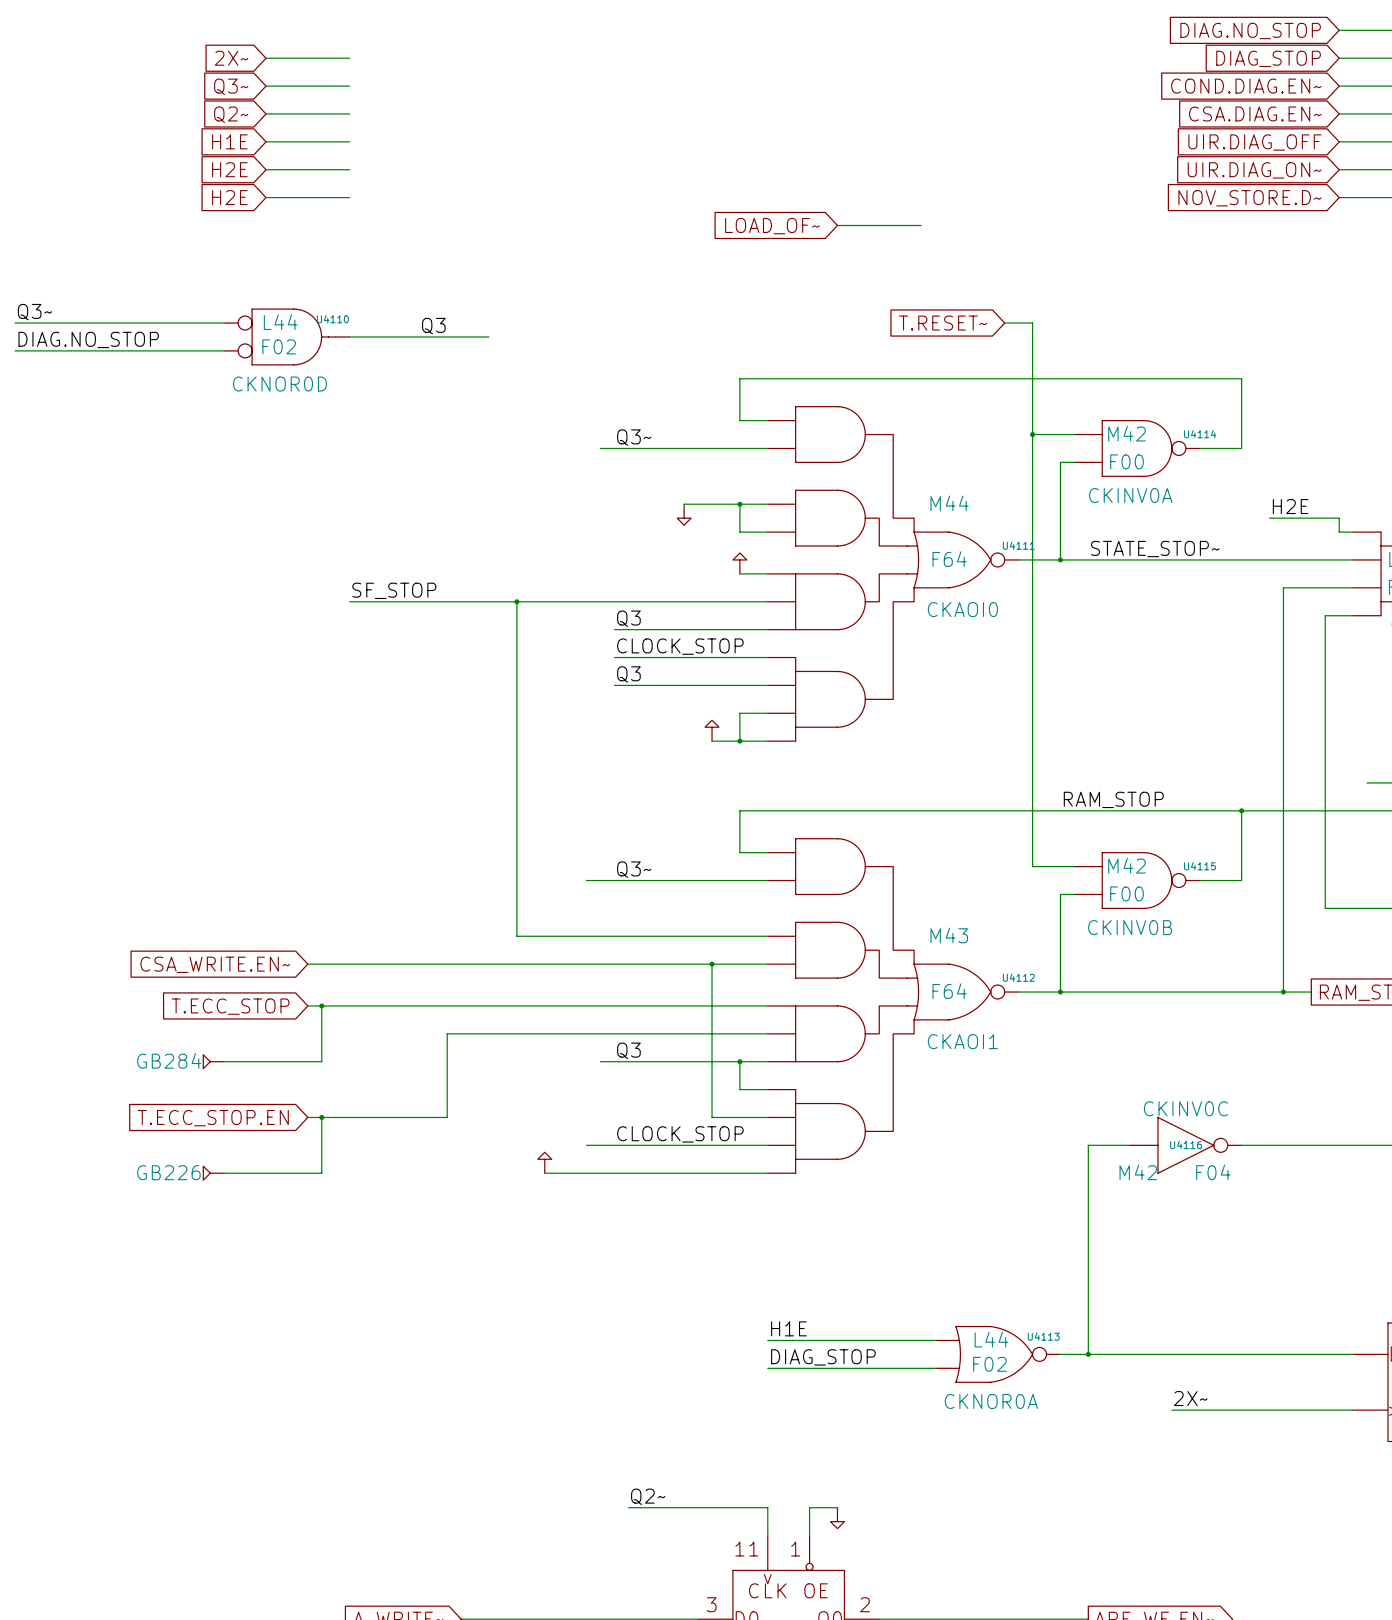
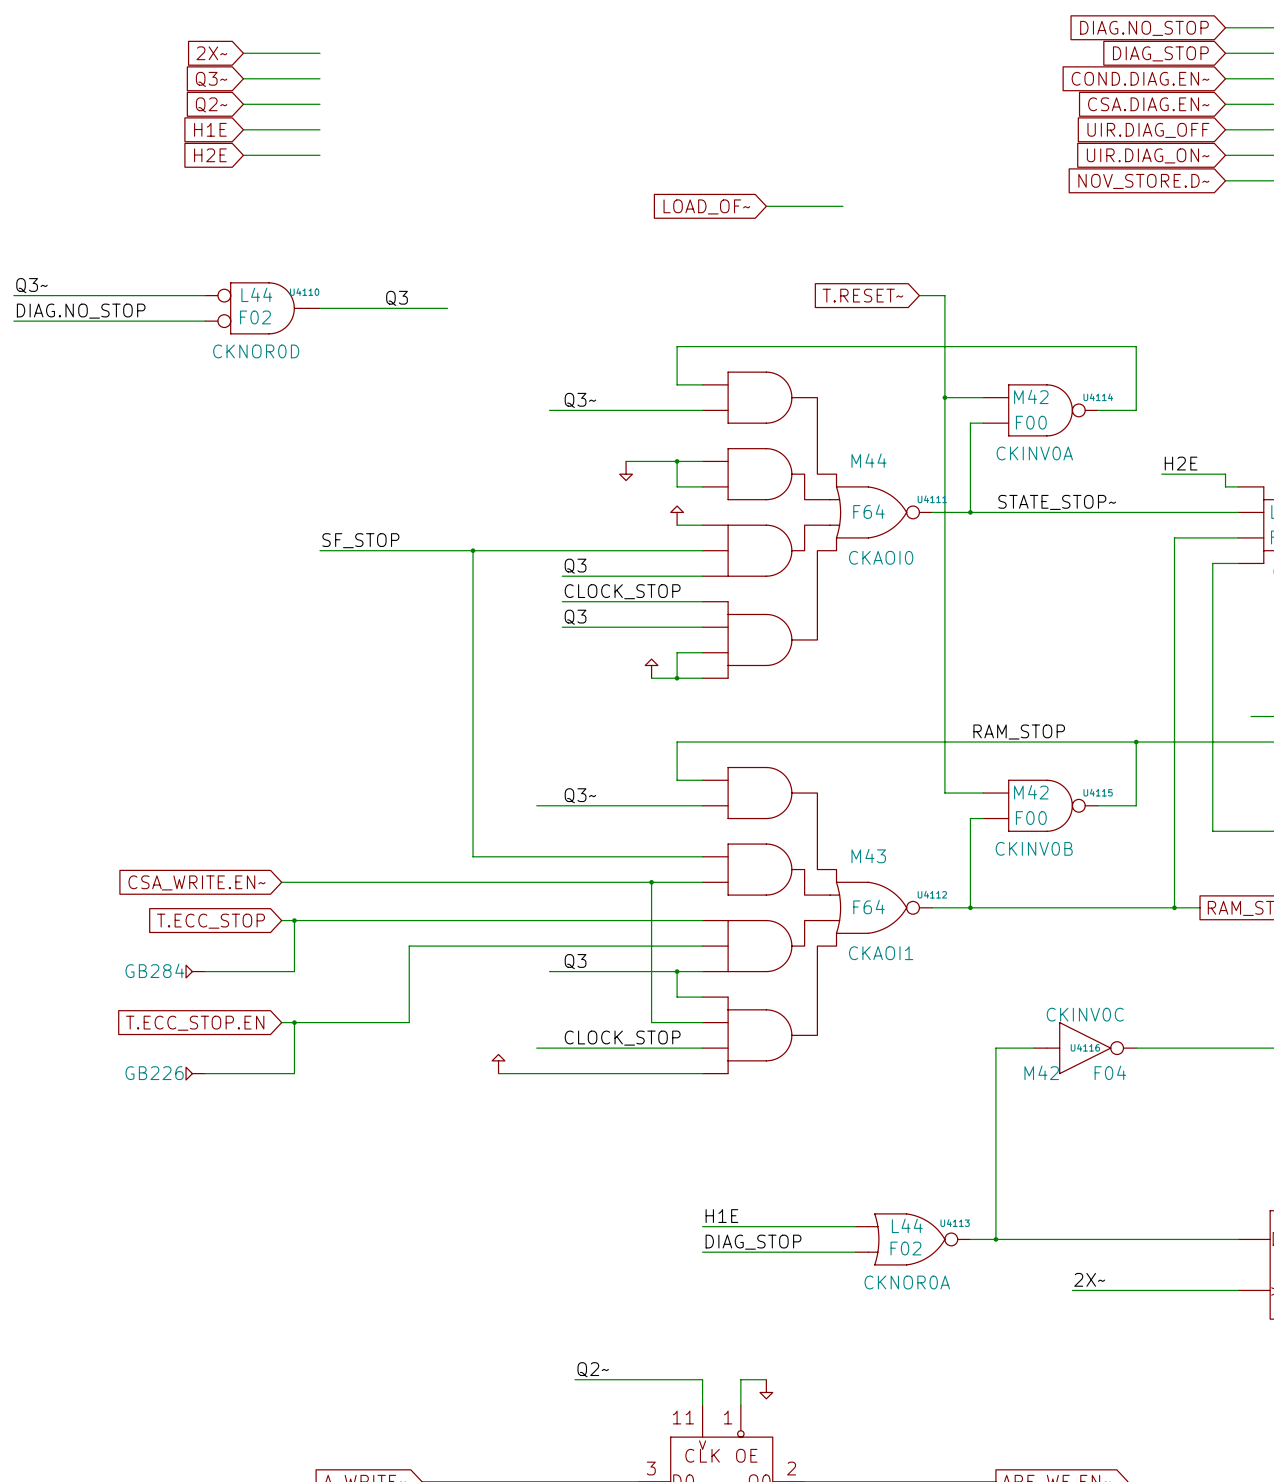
global label: H2E (229, 197) -> none
wire: (266, 197) (349, 197) -> none

